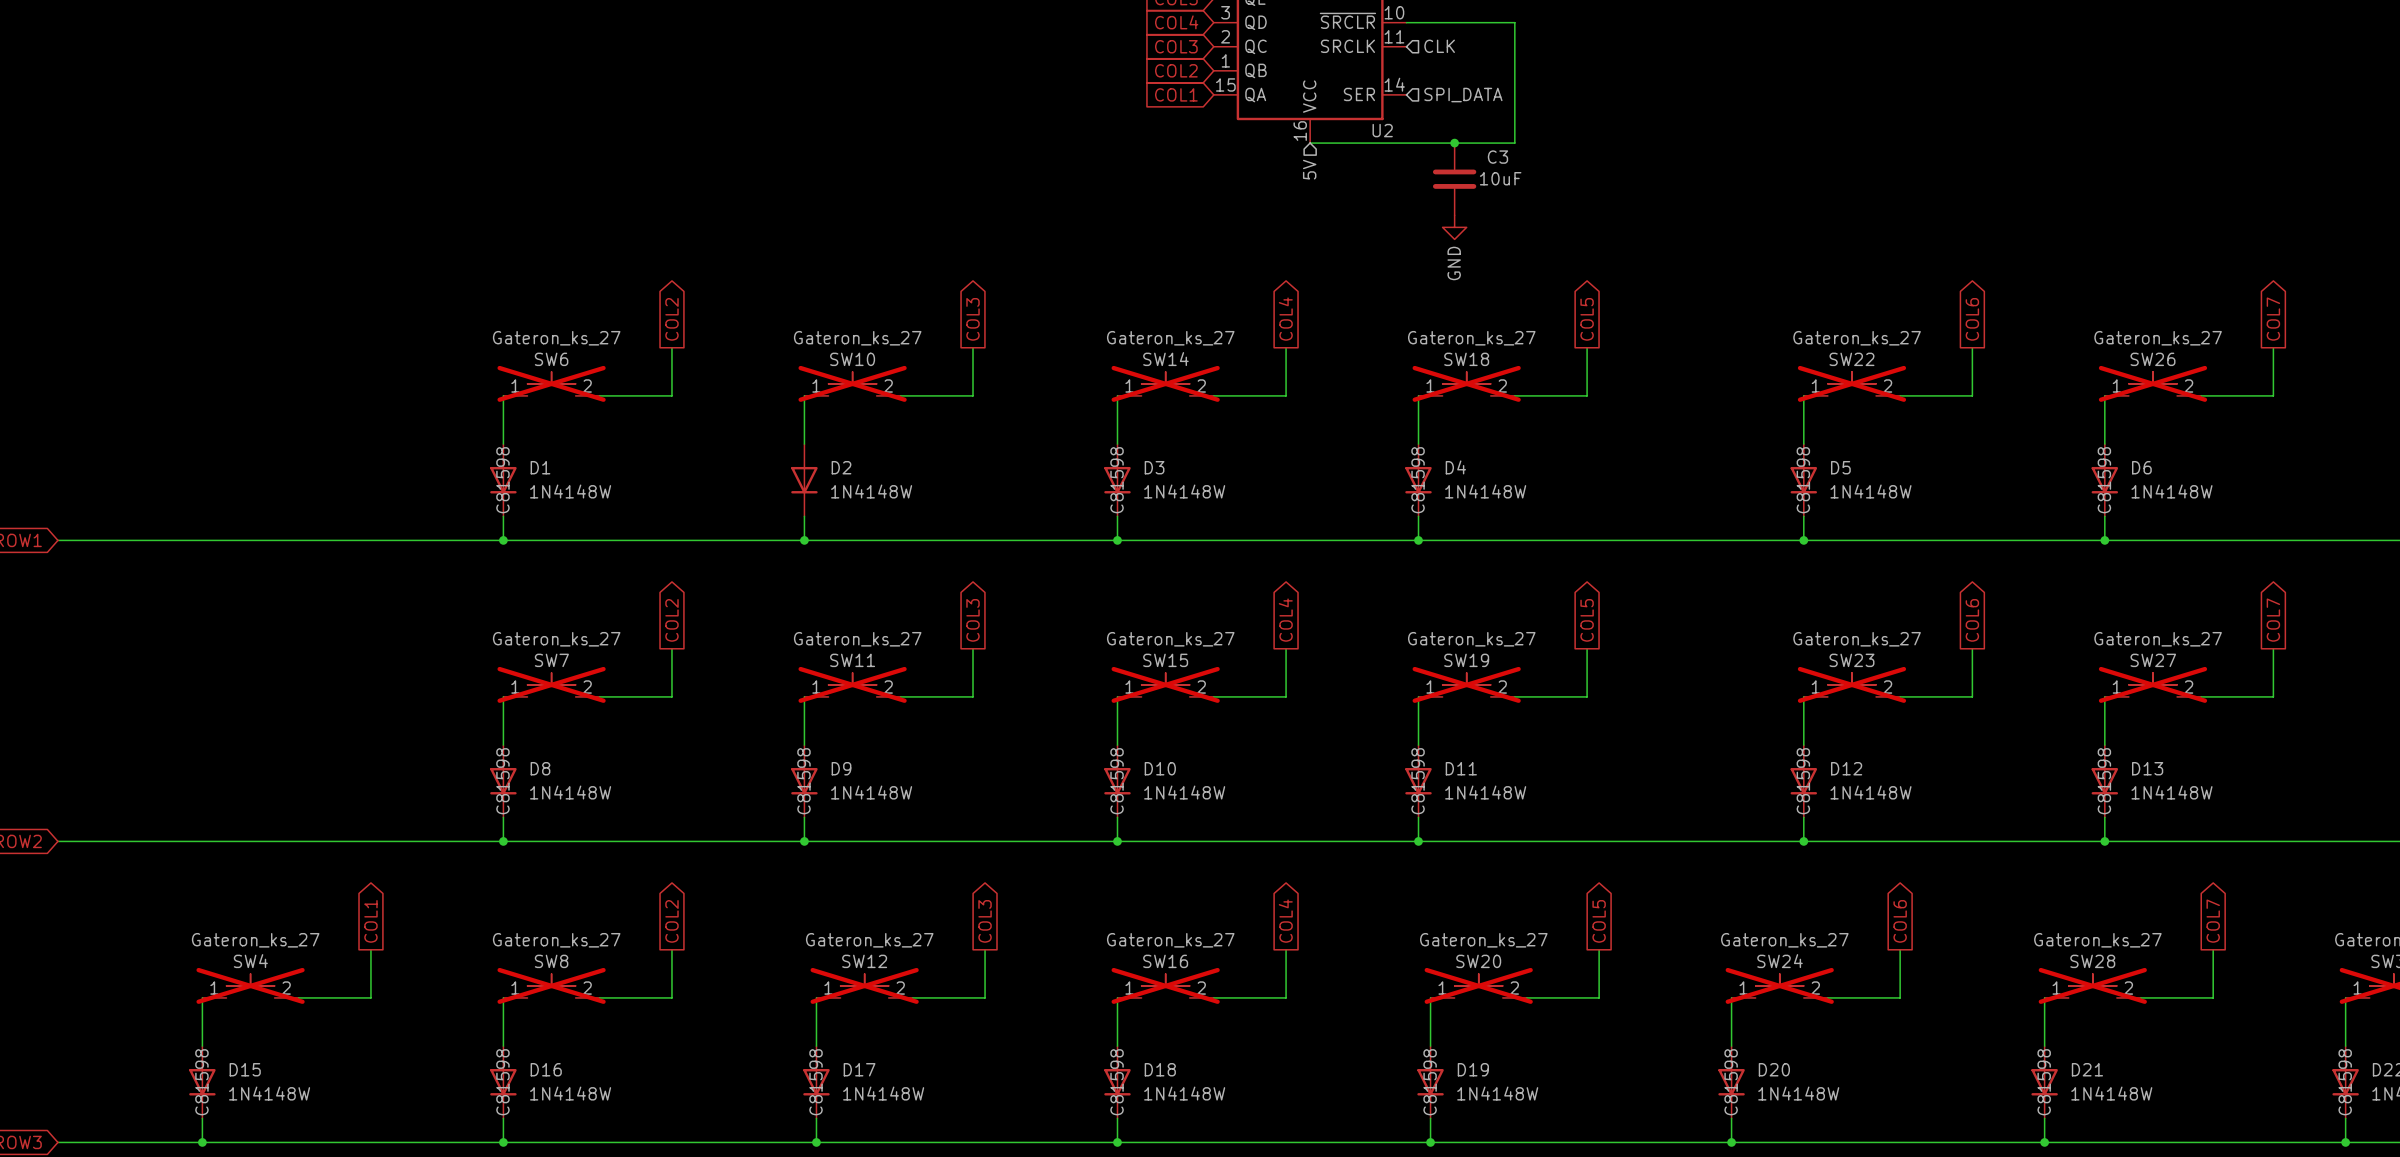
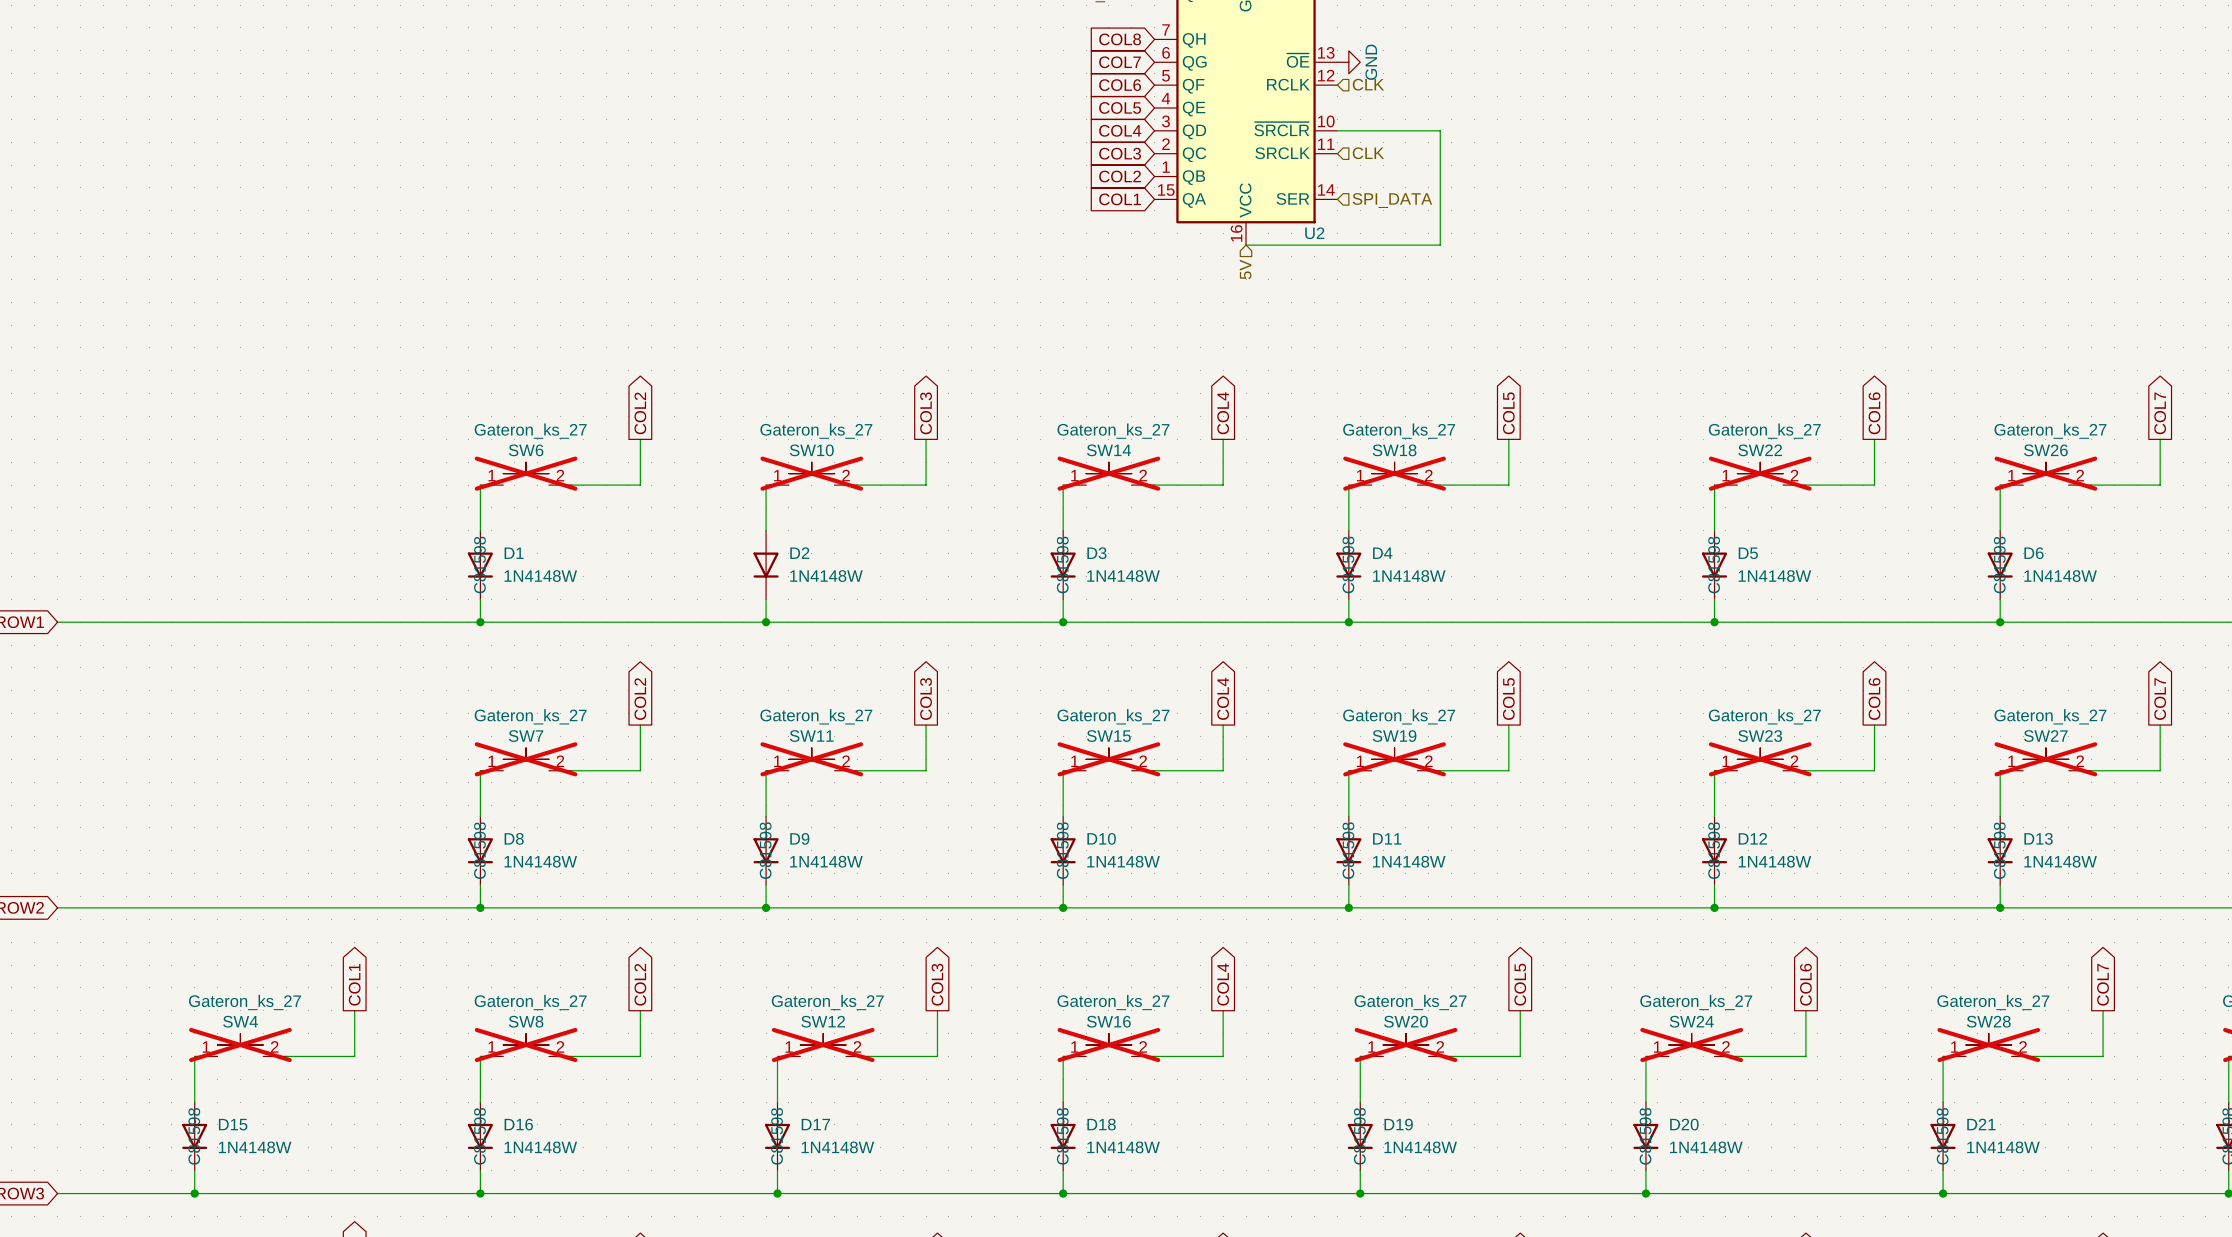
junction: (1454, 143) -> none
C3: 10uF (1454, 179) -> none
power symbol: GND (1454, 227) -> none

